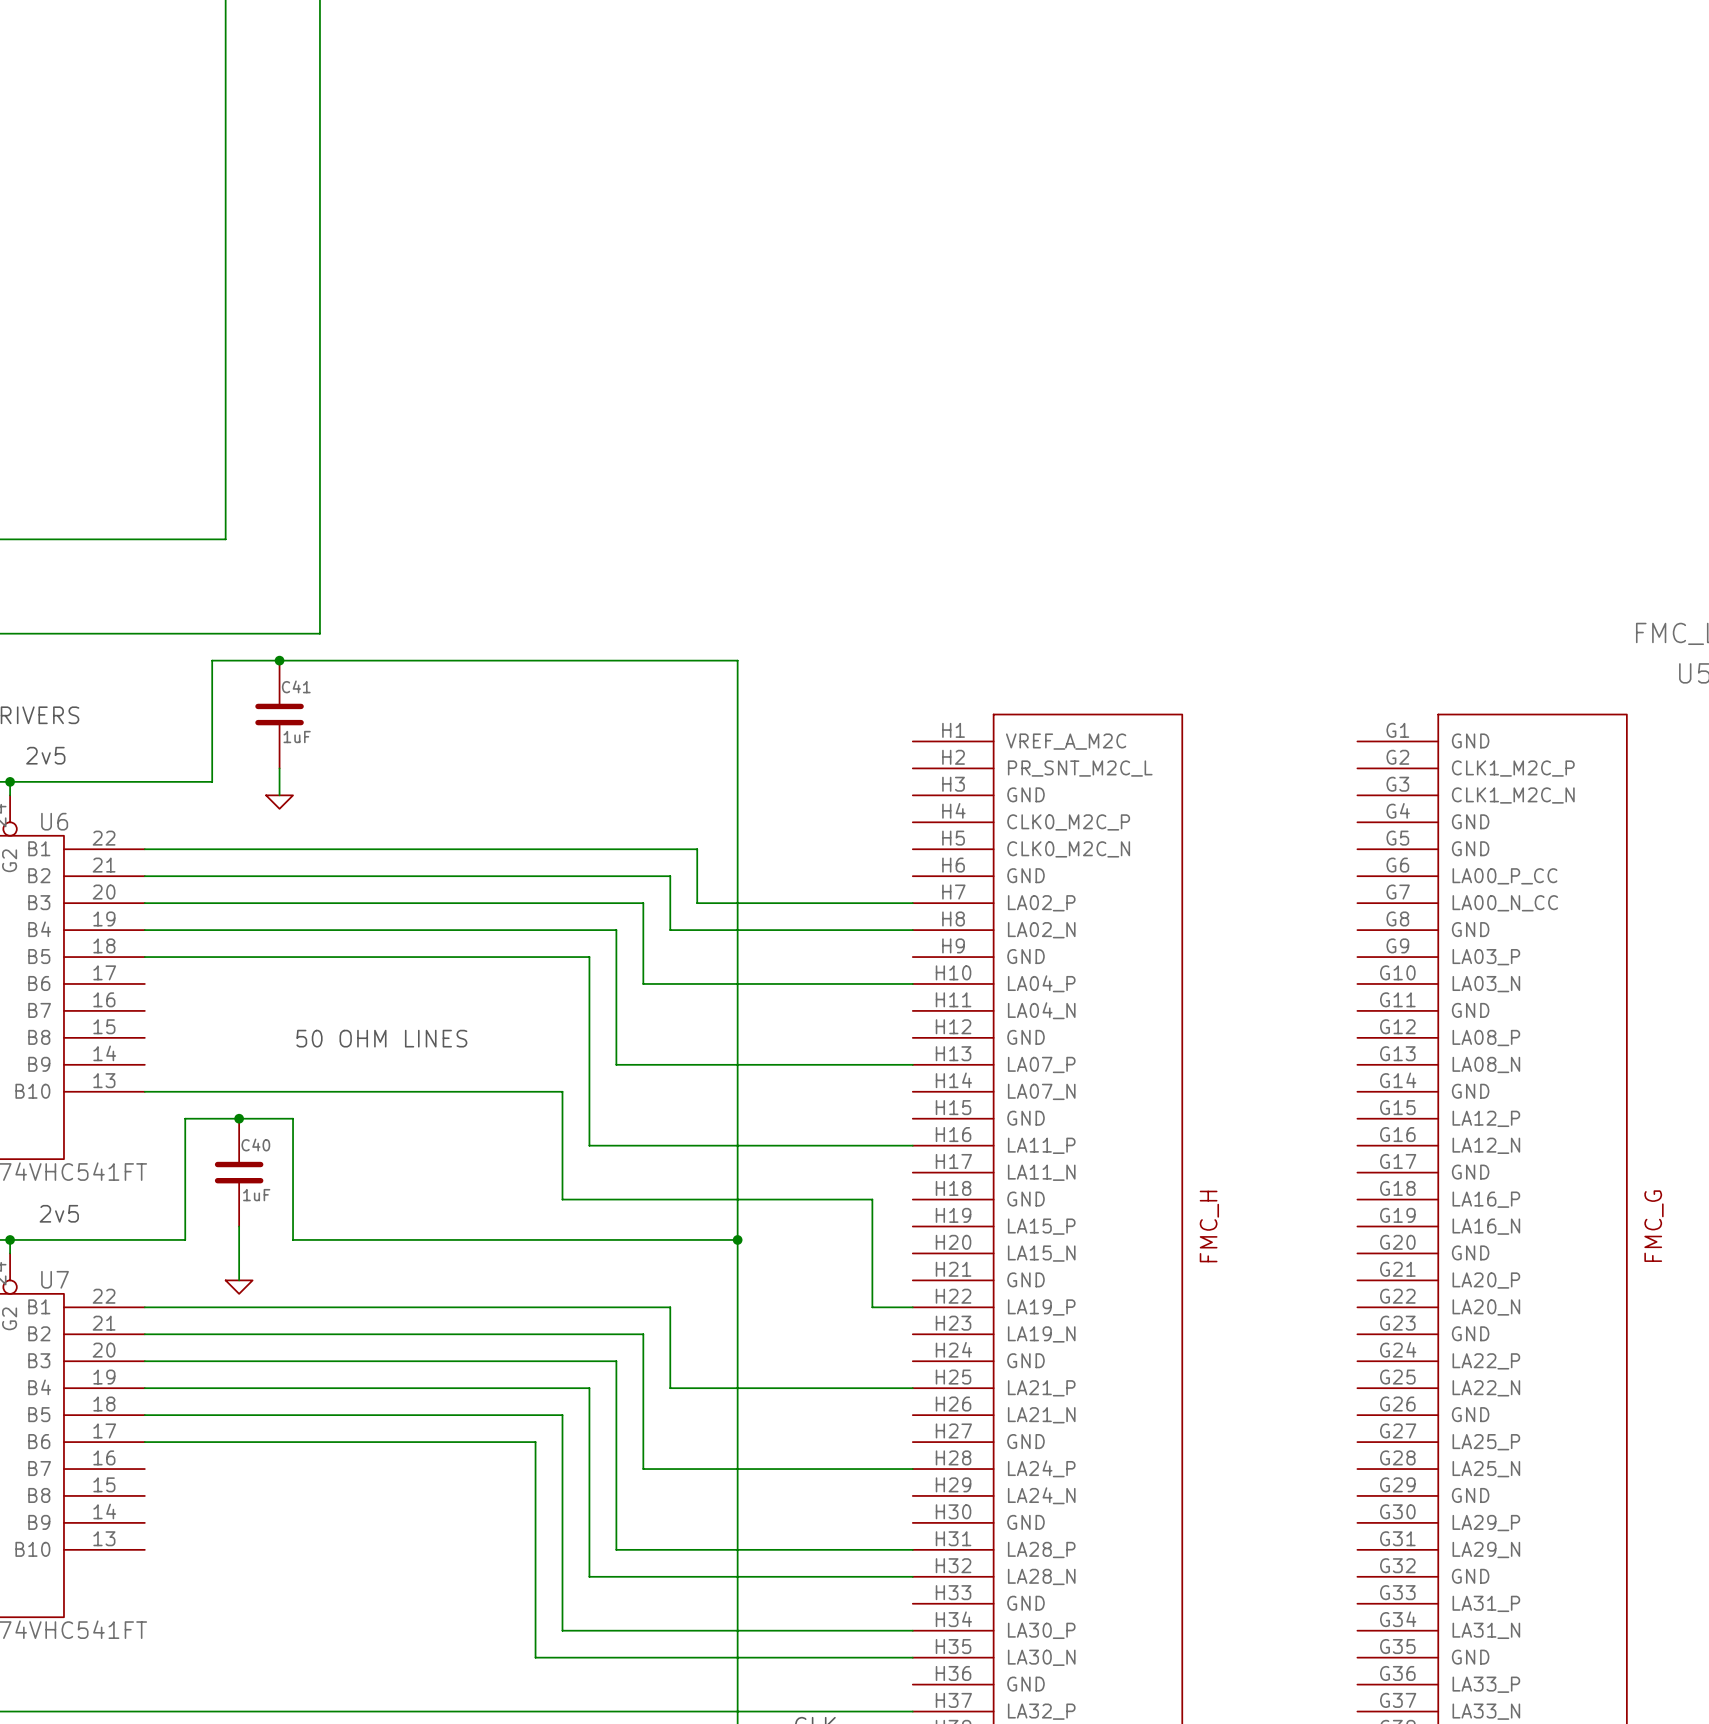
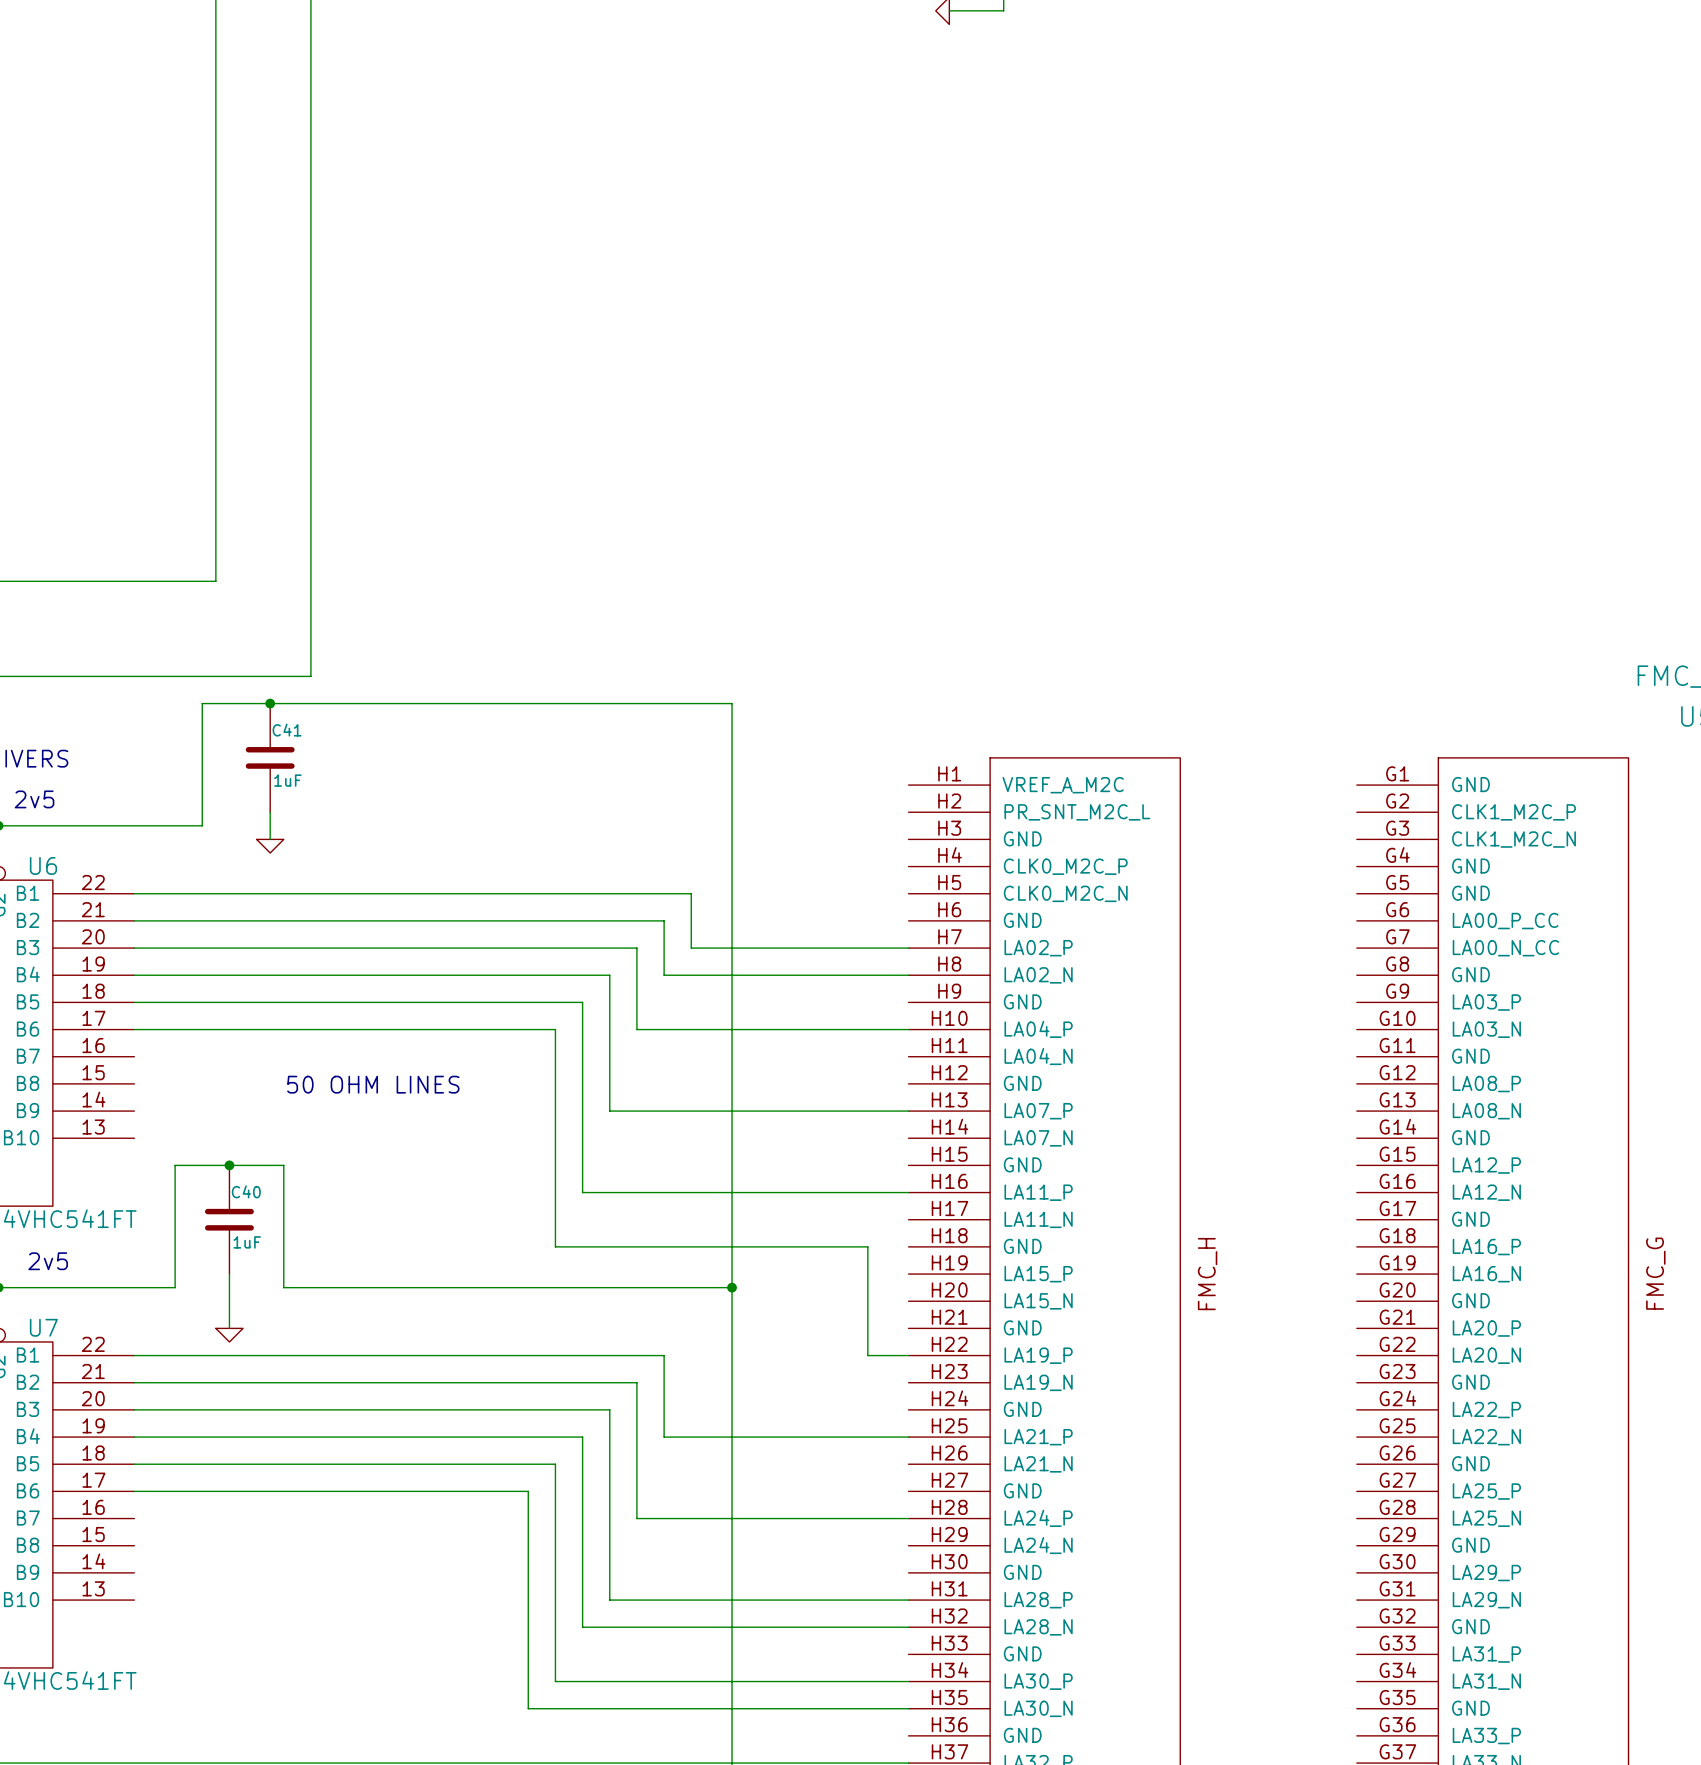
wire: (144, 1091) (562, 1091) -> (134, 1029) (555, 1029) (555, 1138)

